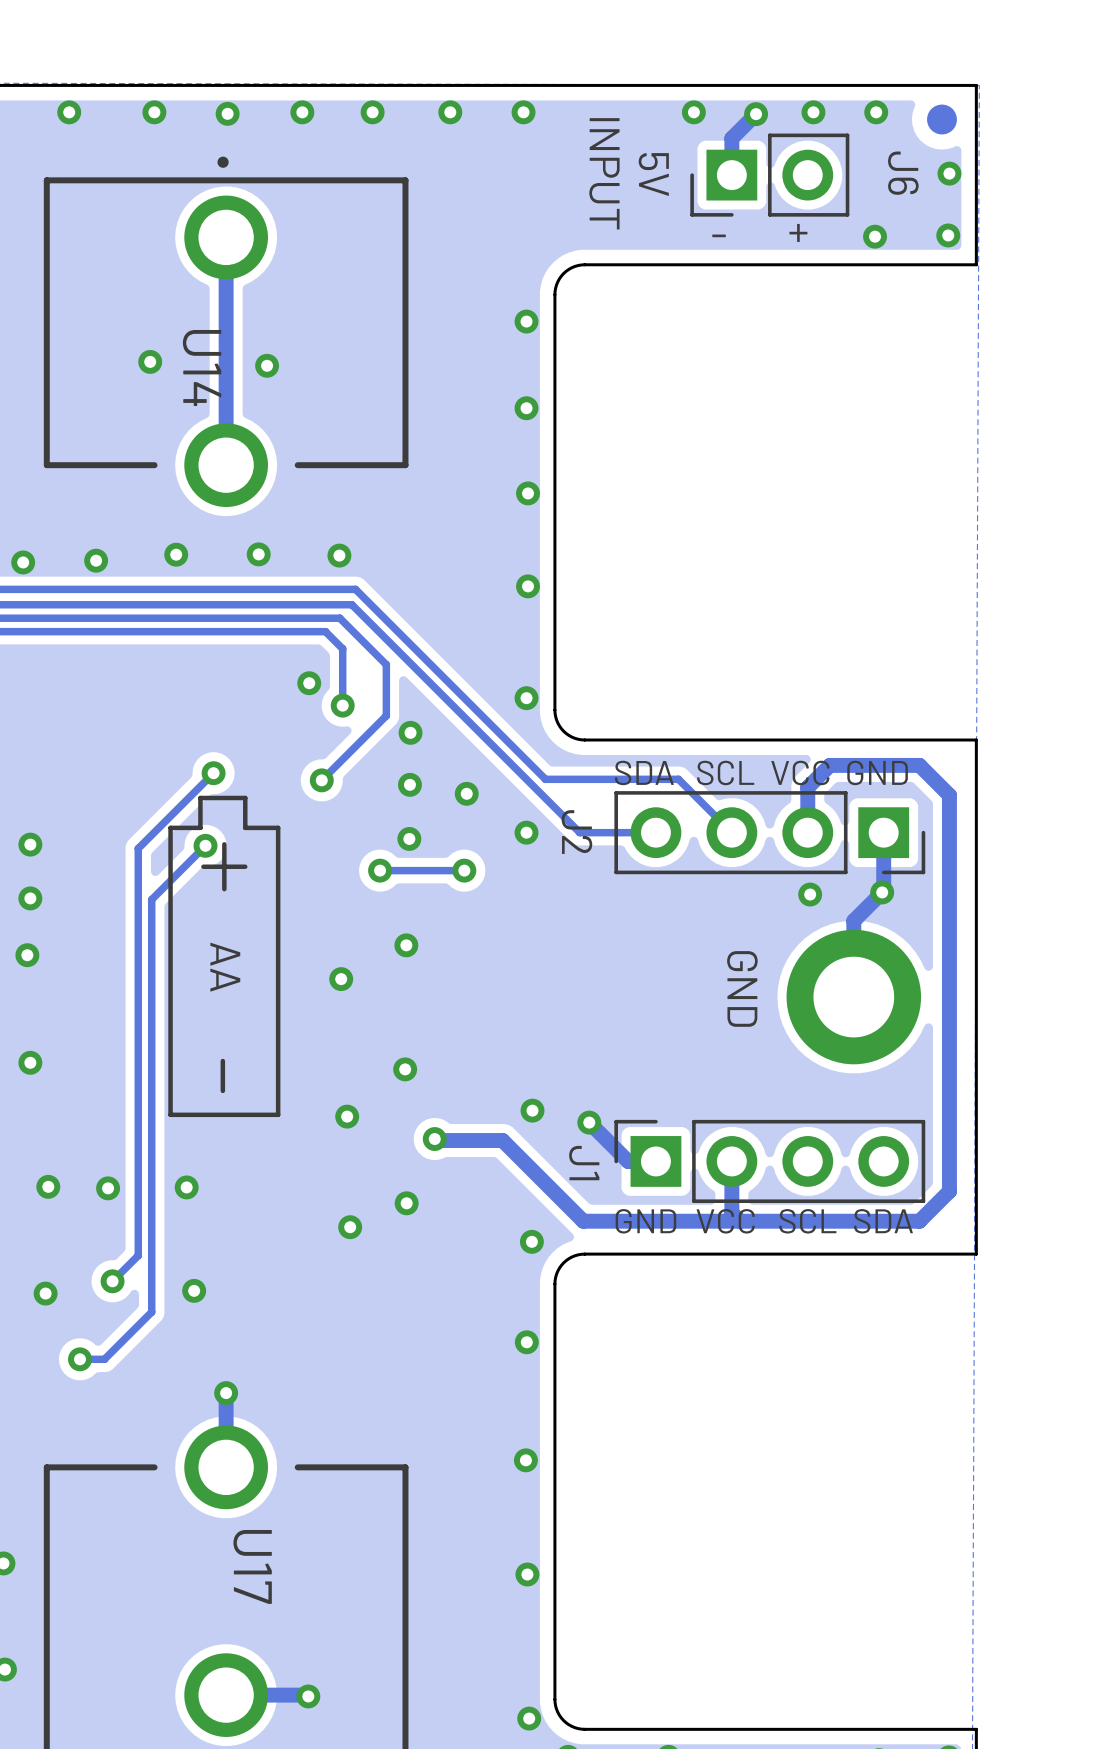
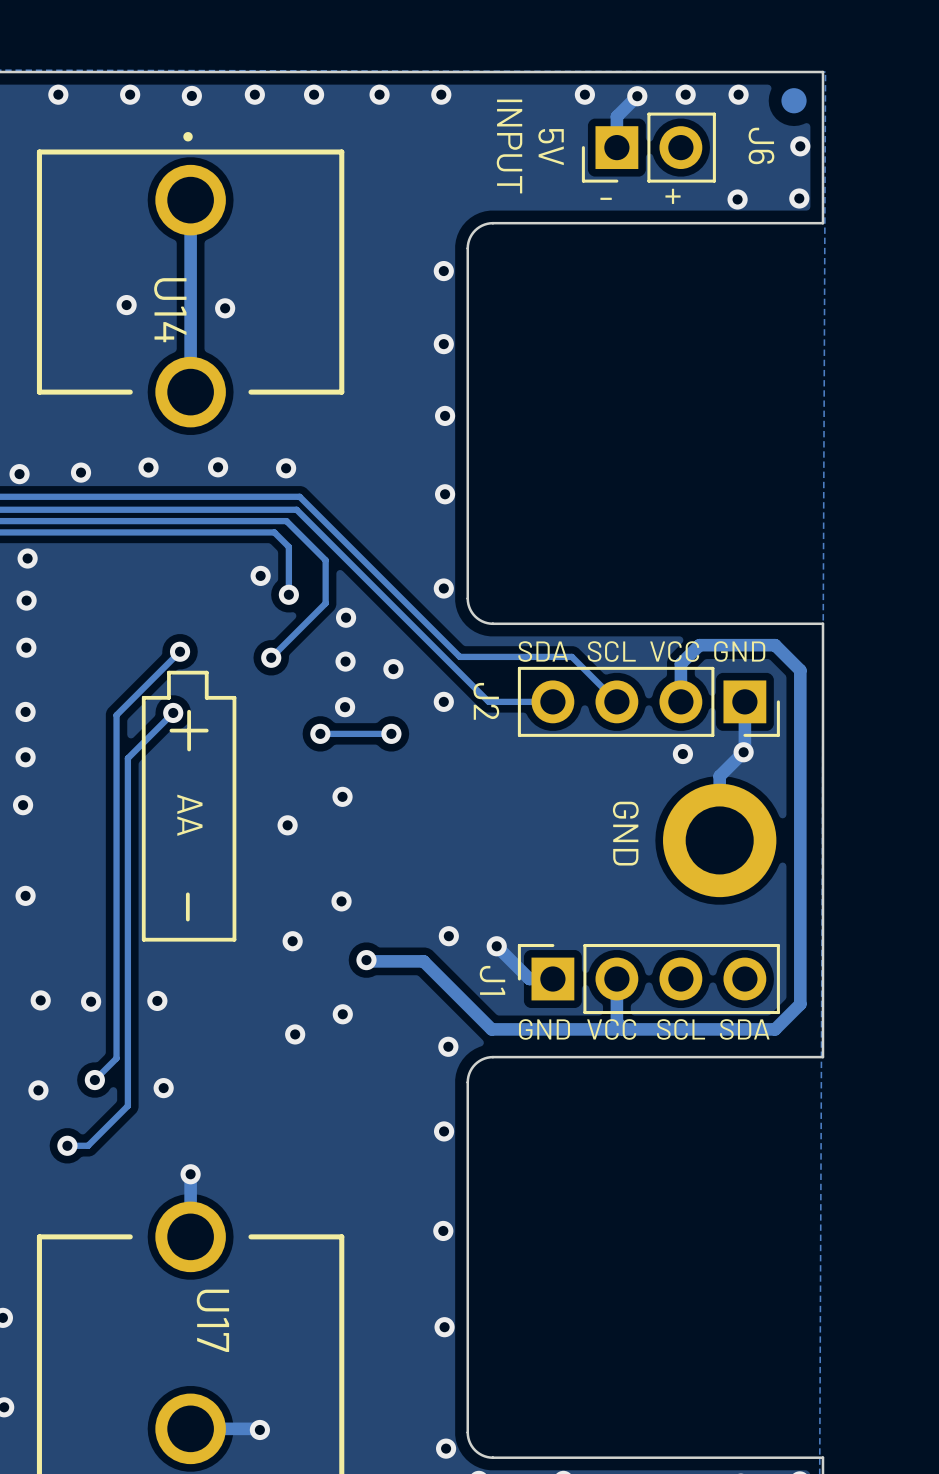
via: none -> (27, 558)
via: none -> (26, 600)
via: none -> (26, 647)

